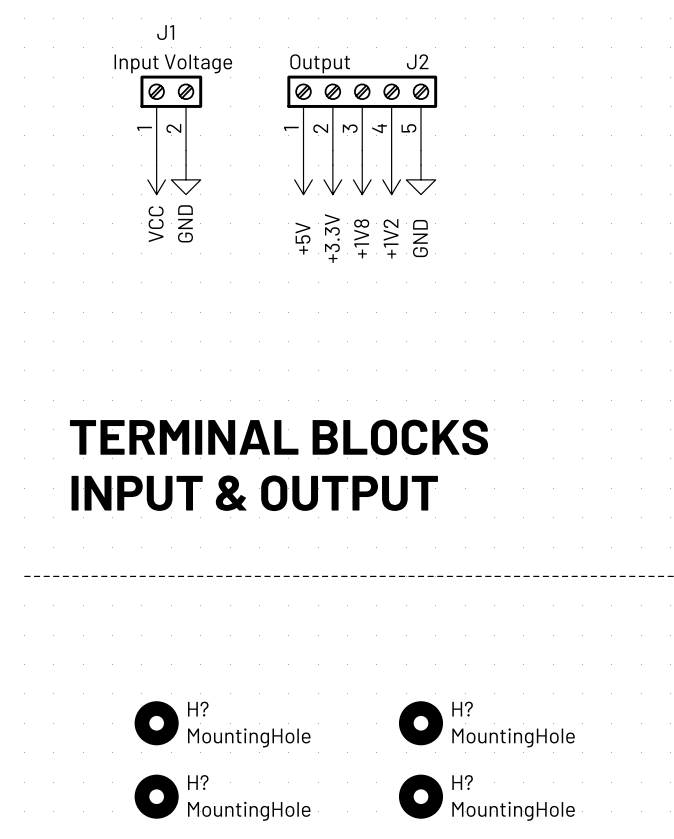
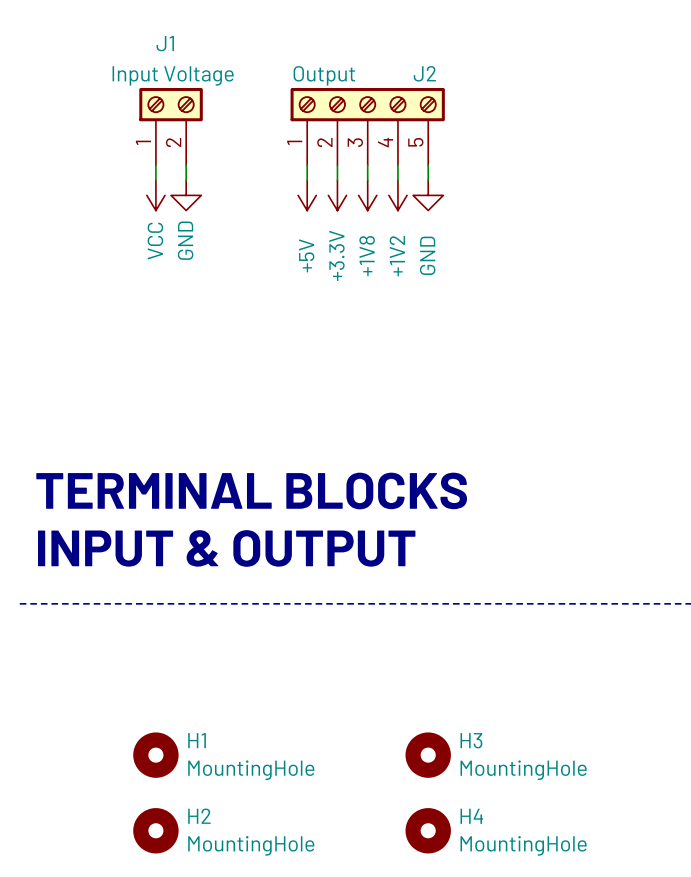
text position: TERMINAL BLOCKS (278, 437) -> TERMINAL BLOCKS (251, 490)
text position: INPUT & OUTPUT (254, 493) -> INPUT & OUTPUT (226, 548)
H? name: H? (198, 709) -> H1 (197, 740)
H? name: H? (462, 709) -> H3 (471, 740)
H? name: H? (198, 782) -> H2 (199, 816)
H? name: H? (462, 782) -> H4 (471, 816)

